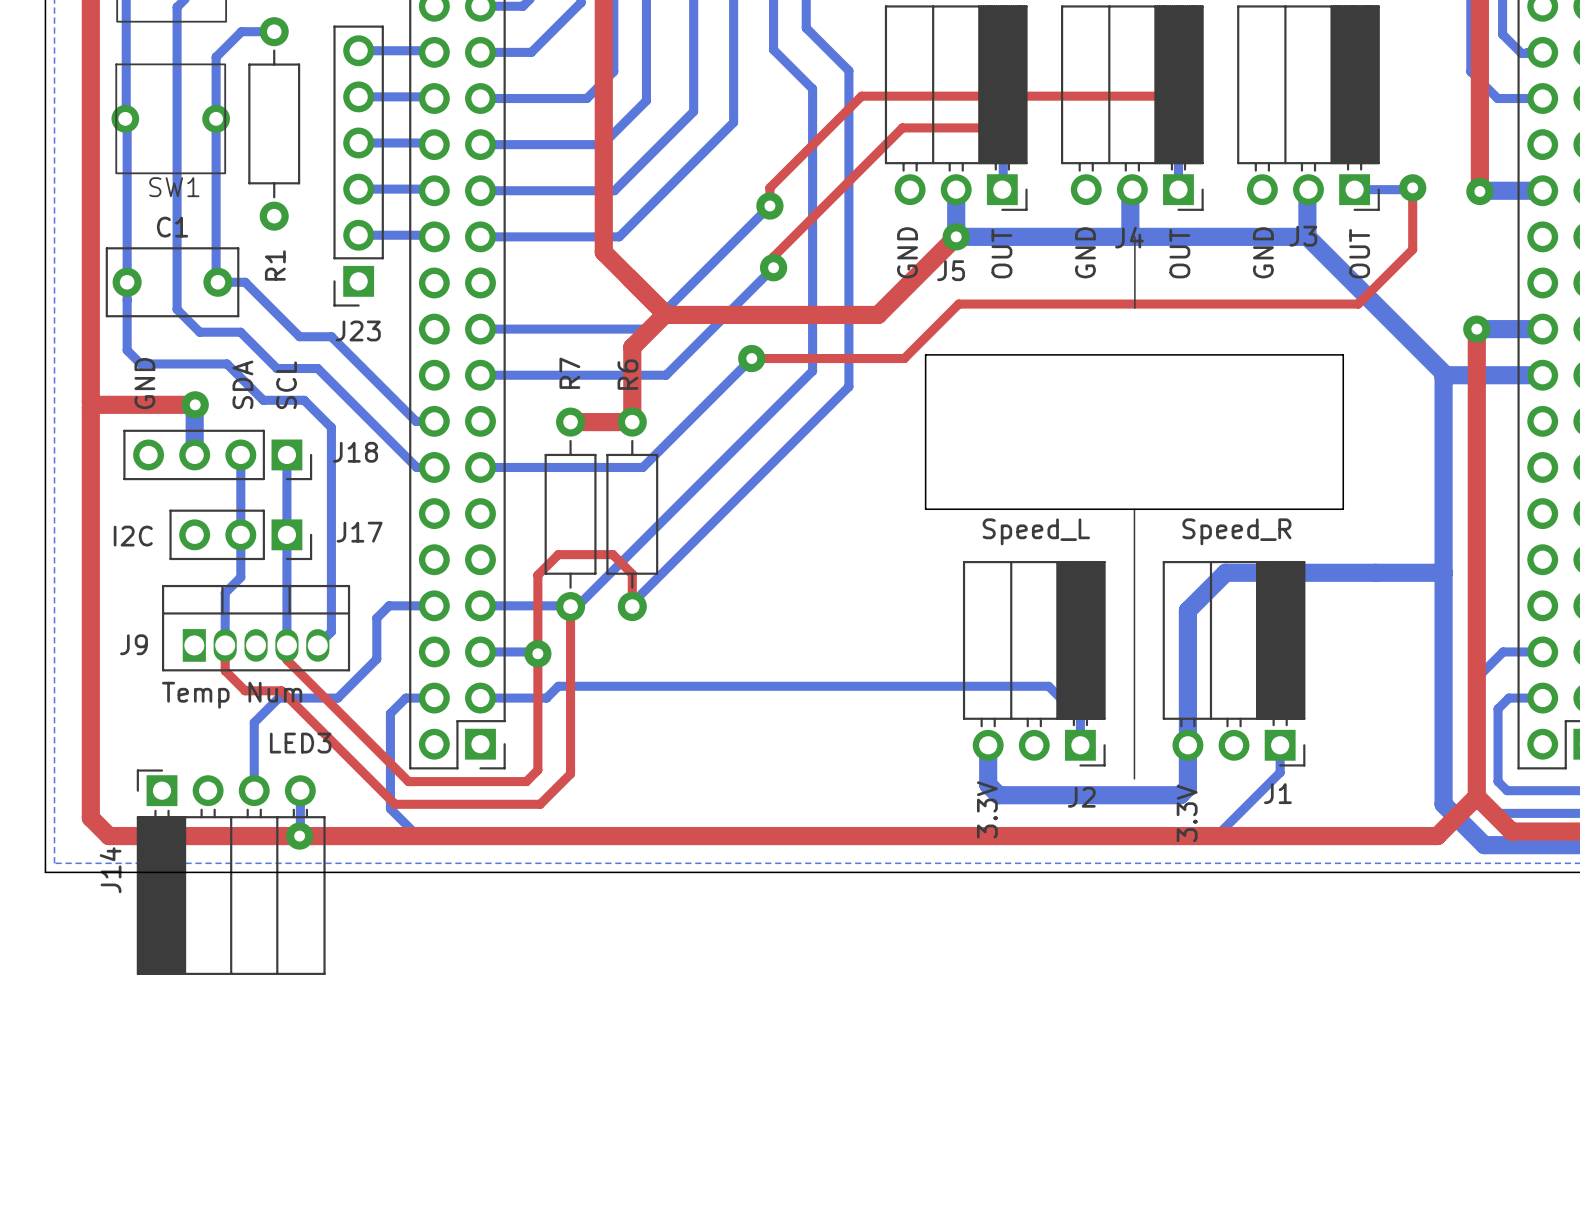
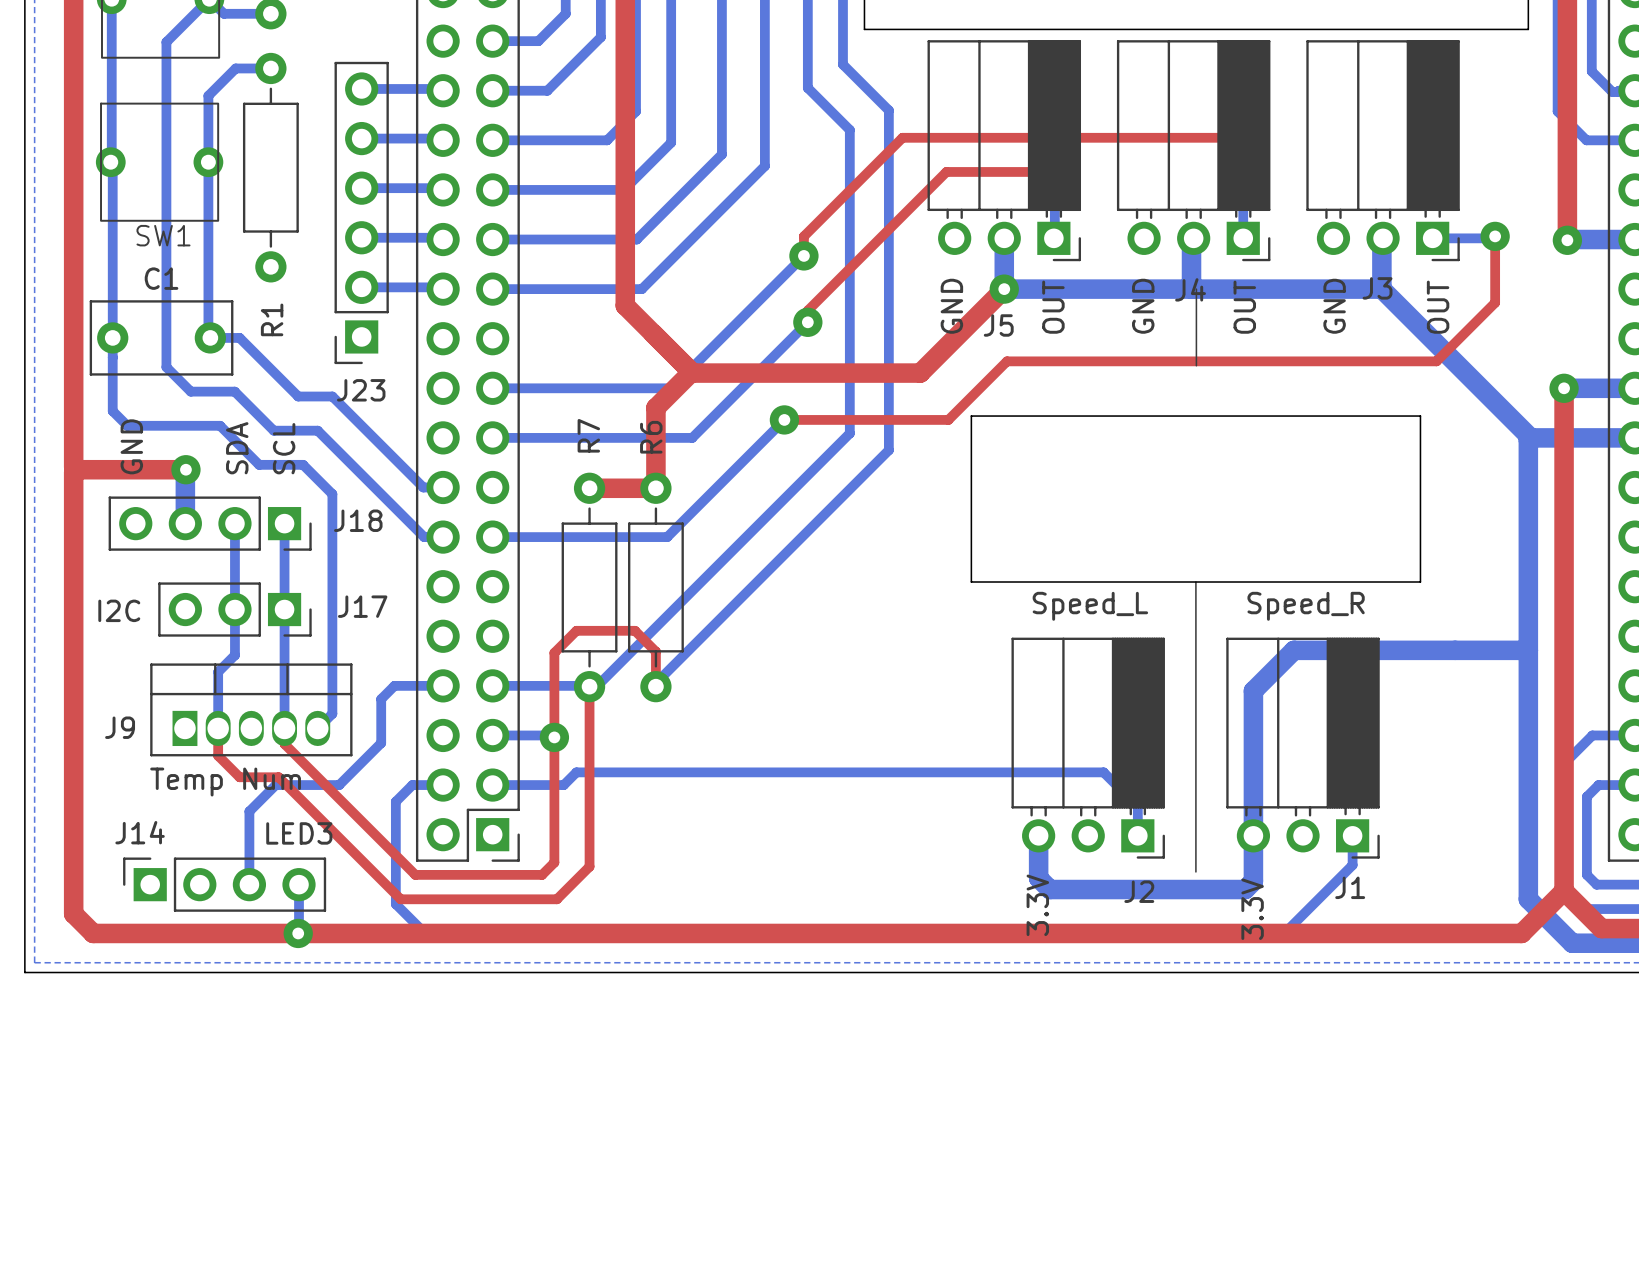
J14 footprint: [136, 769, 326, 975] -> [123, 857, 327, 912]
J14 name position: J14 (110, 870) -> J14 (140, 832)

